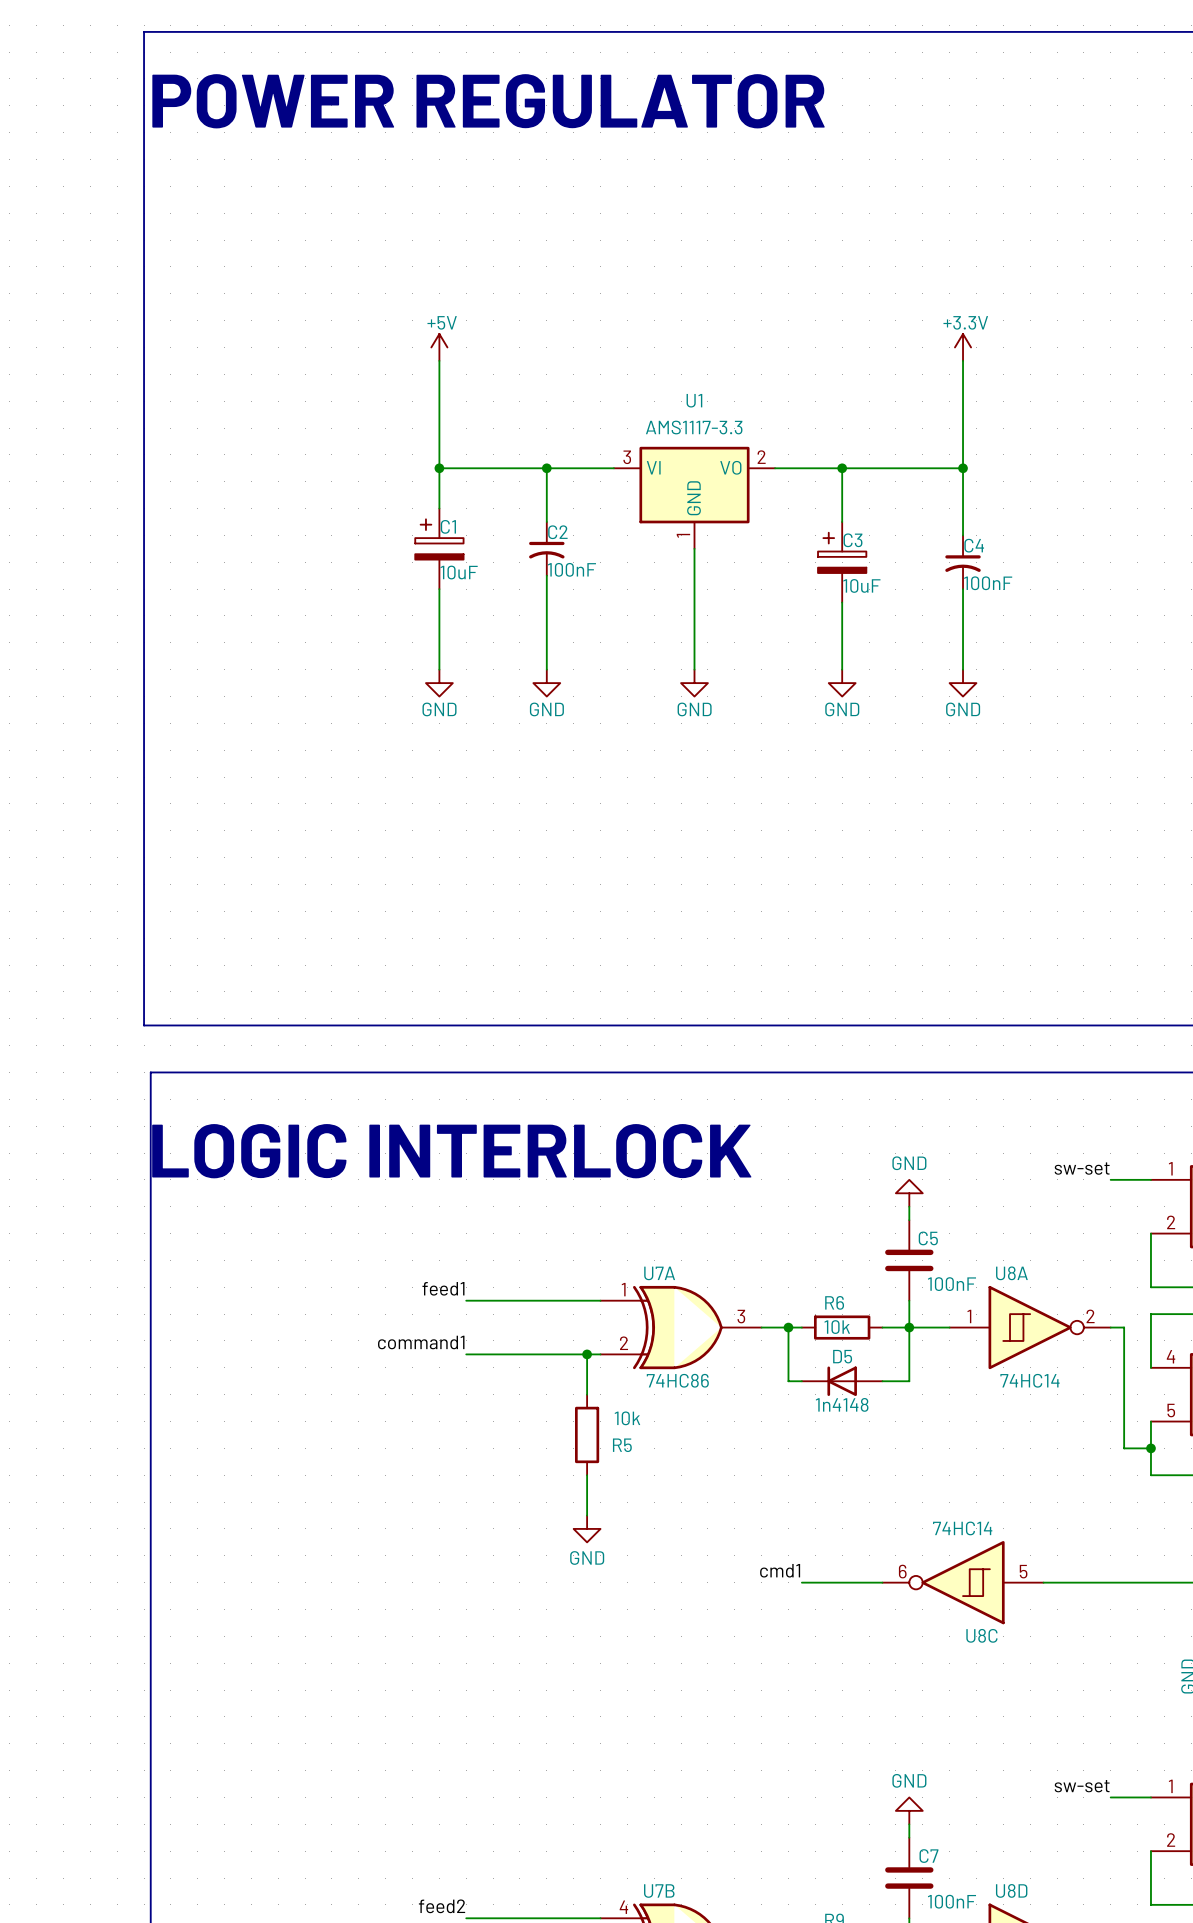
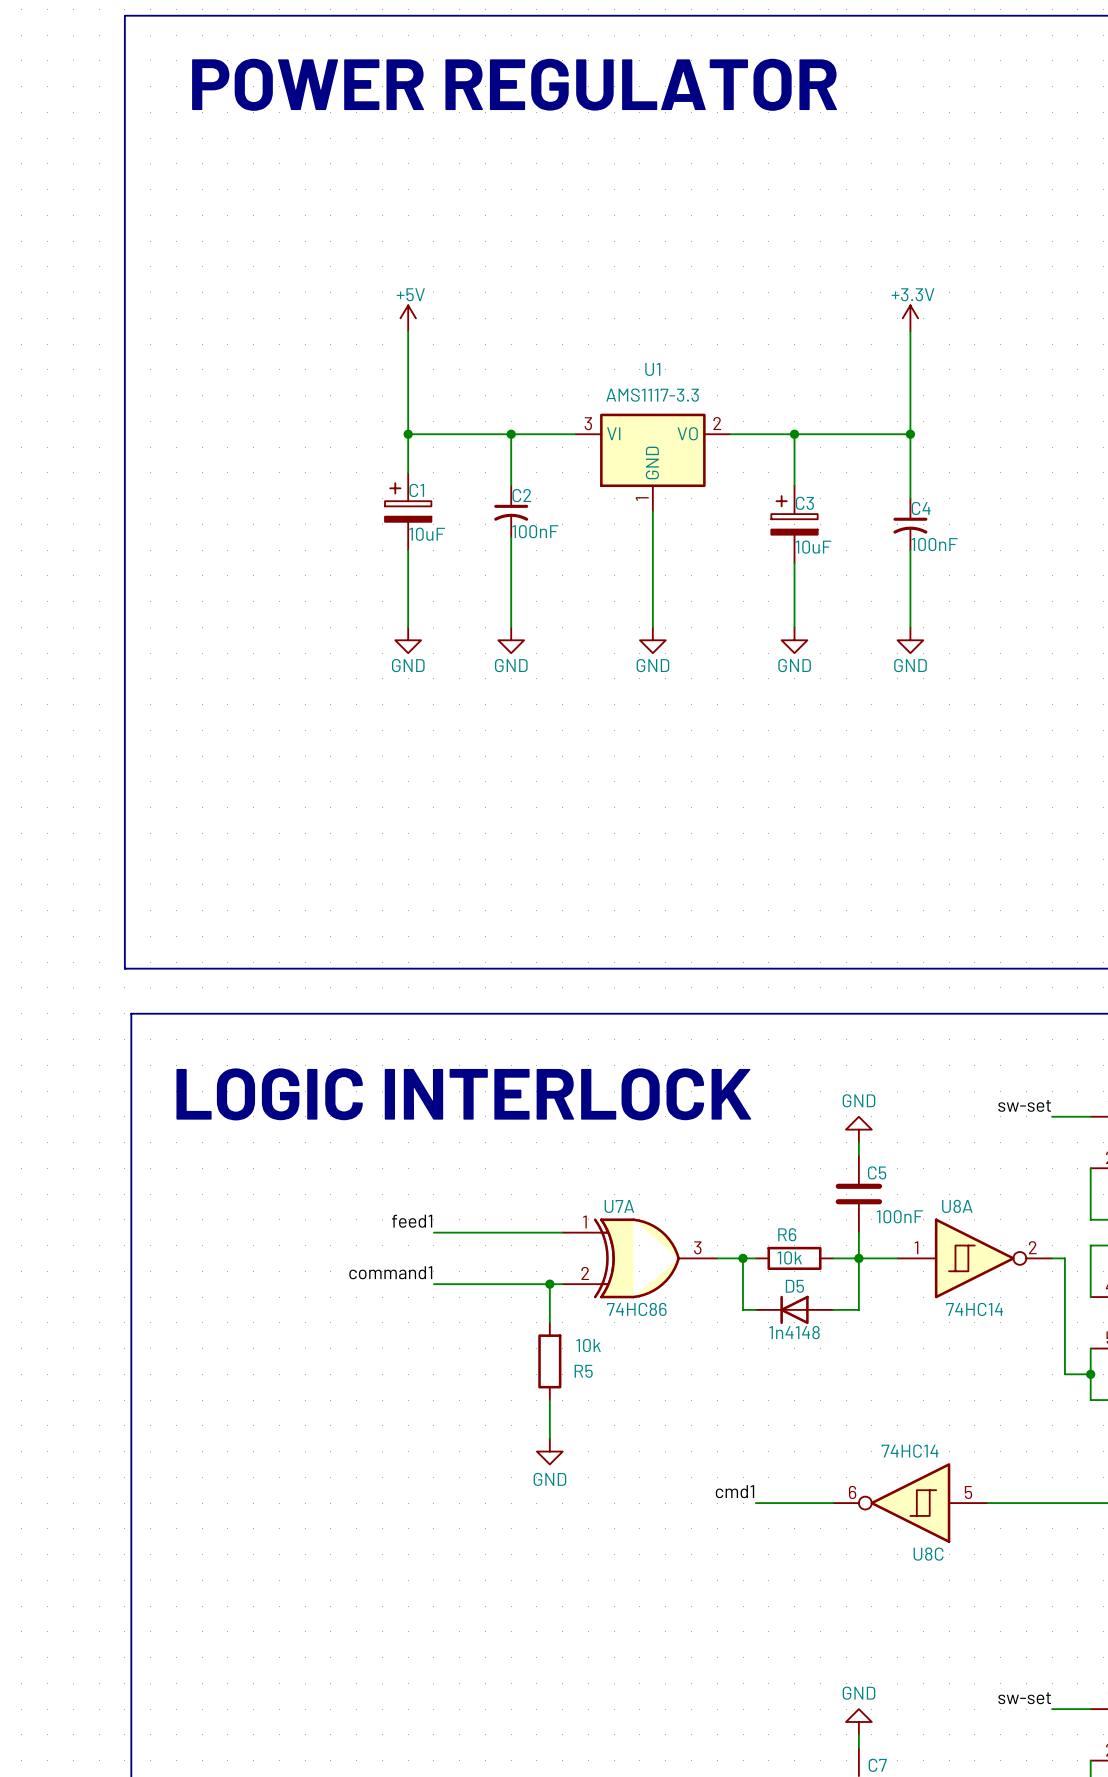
text position: POWER REGULATOR (488, 101) -> POWER REGULATOR (514, 84)
text position: LOGIC INTERLOCK (451, 1151) -> LOGIC INTERLOCK (463, 1094)

